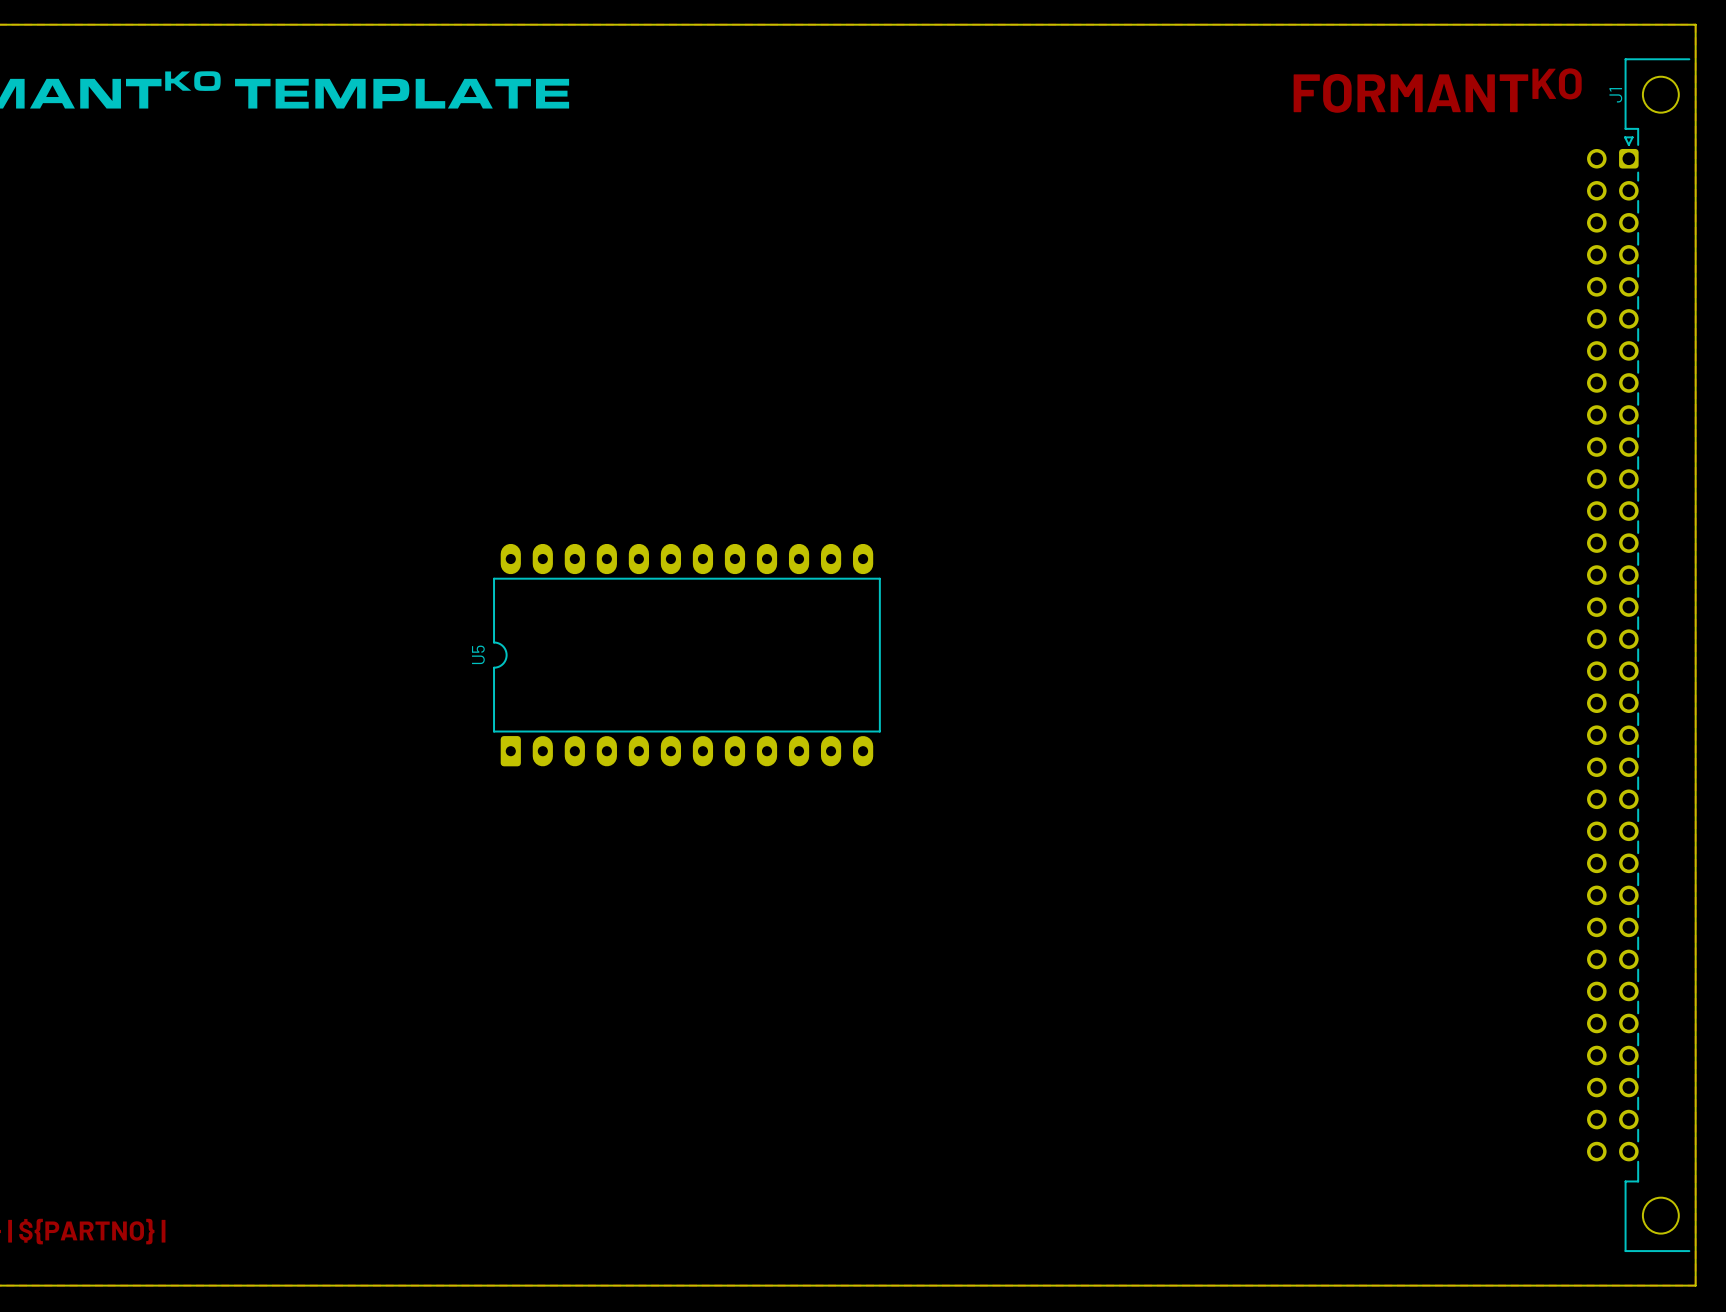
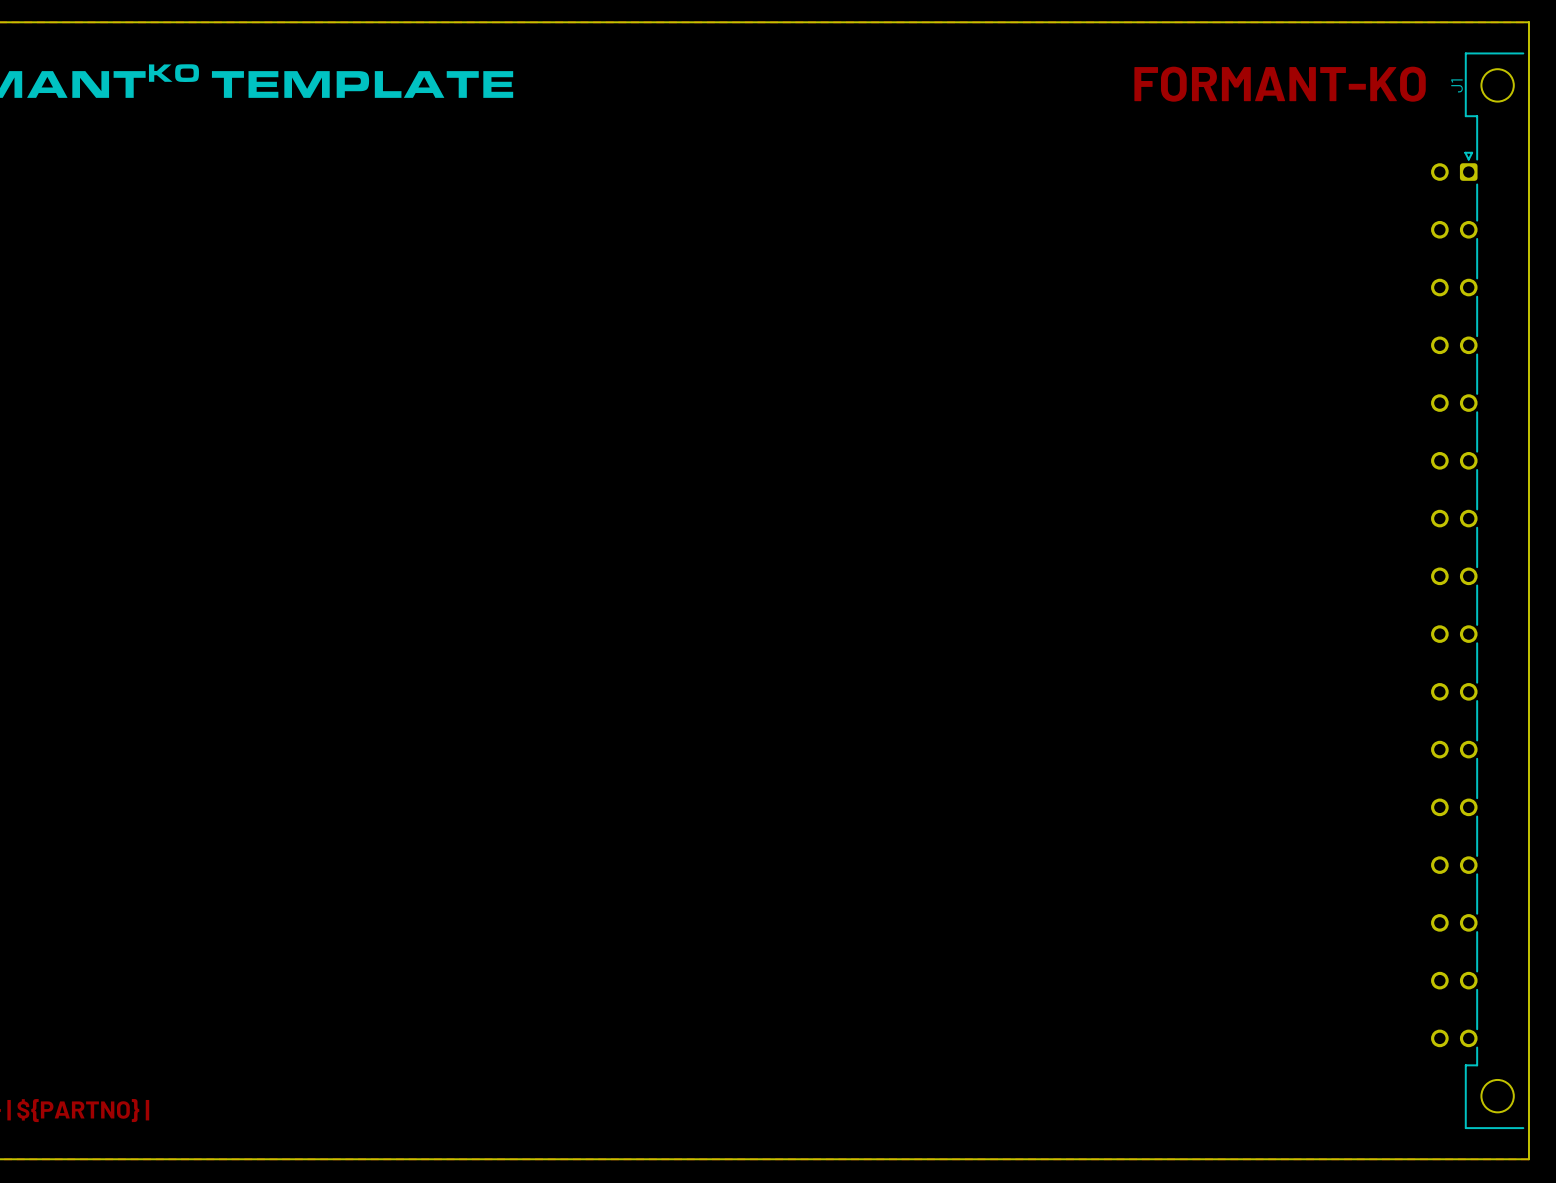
J1 footprint: [1587, 58, 1691, 1252] -> [1431, 52, 1524, 1129]
text: FORMANTKO (1437, 90) -> FORMANT-KO (1280, 84)
U5: (686, 655) -> none

